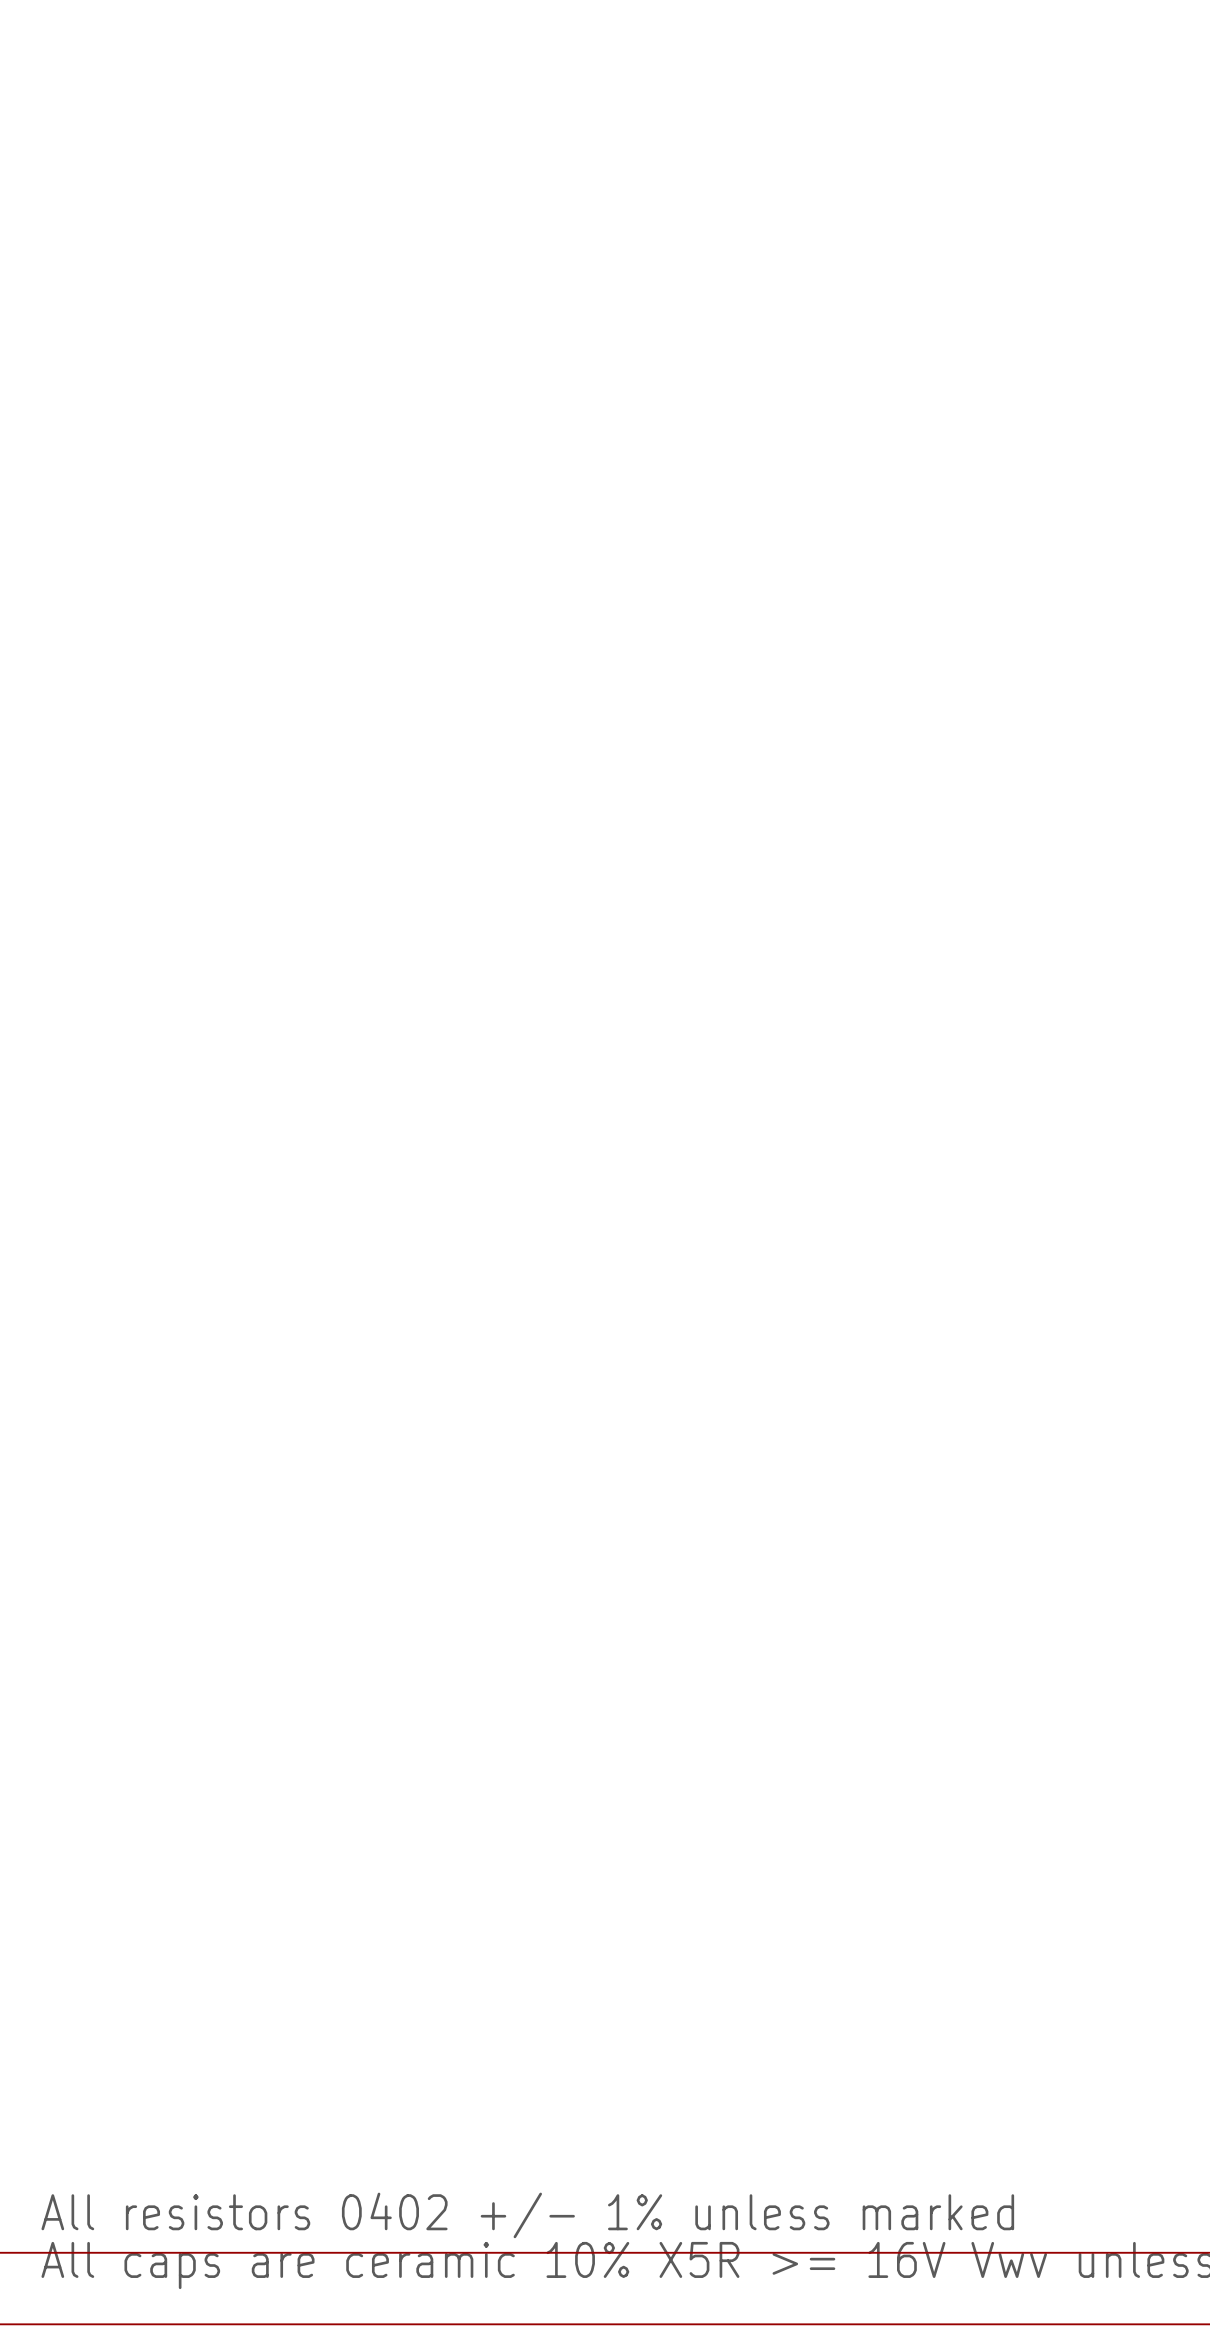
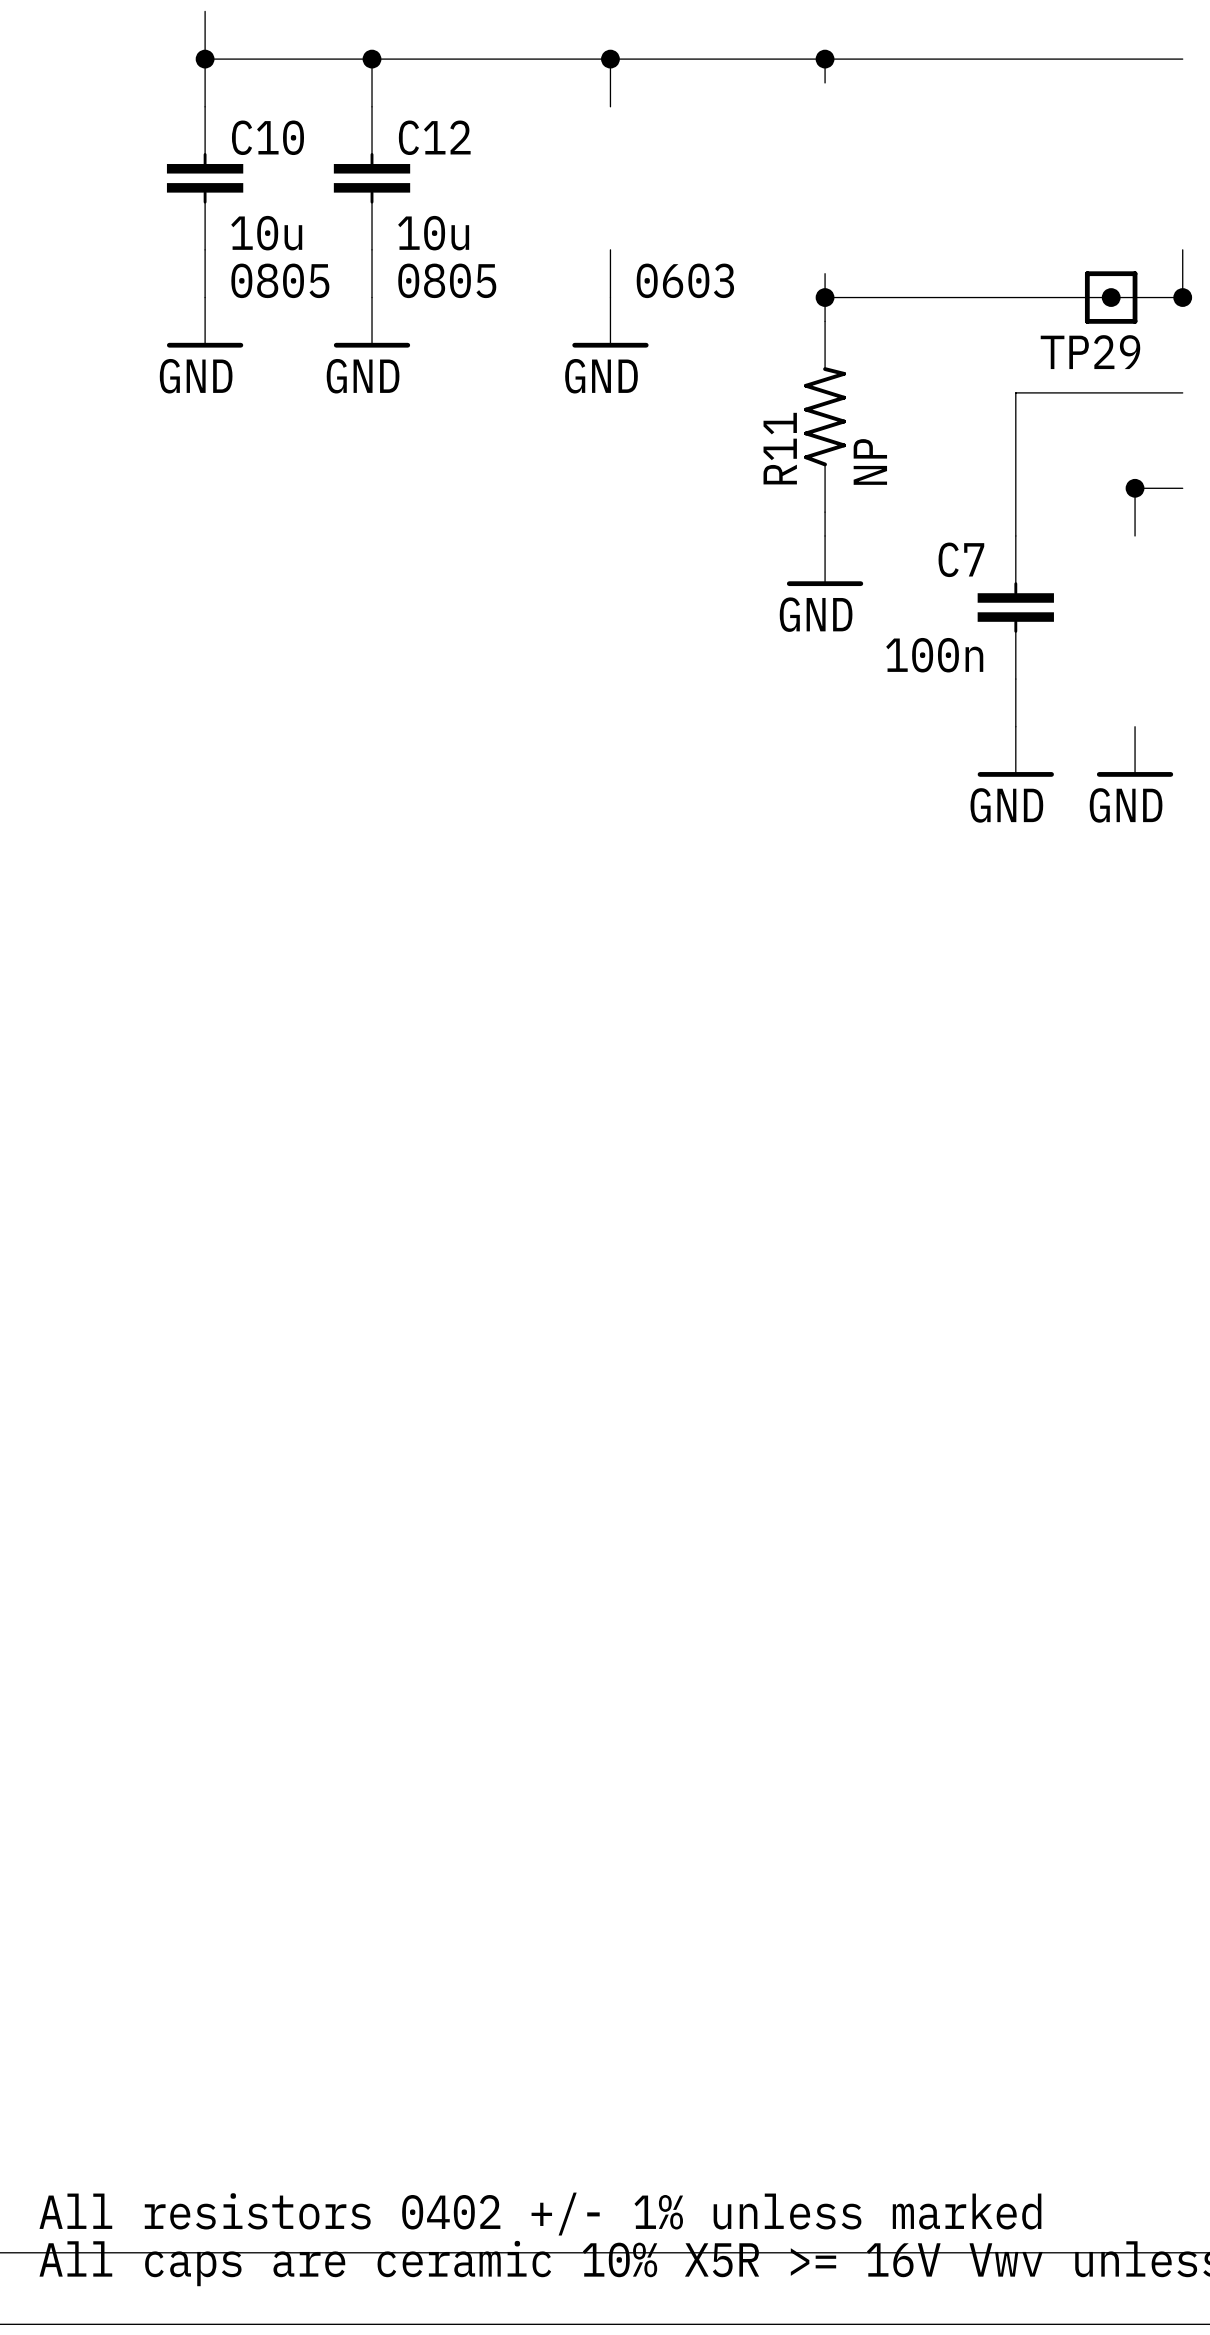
wire: none -> (205, 11) (205, 106)
wire: none -> (205, 59) (1182, 59)
junction: none -> (205, 59)
wire: none -> (372, 59) (372, 106)
junction: none -> (372, 59)
wire: none -> (610, 59) (610, 106)
junction: none -> (610, 59)
wire: none -> (825, 59) (825, 82)
junction: none -> (825, 59)
C10: none -> 10u (205, 178)
C12: none -> 10u (372, 178)
wire: none -> (205, 249) (205, 297)
wire: none -> (372, 249) (372, 297)
wire: none -> (610, 249) (610, 297)
wire: none -> (1182, 249) (1182, 297) (825, 297)
wire: none -> (825, 273) (825, 321)
text: none -> 0805 (280, 280)
text: none -> 0805 (447, 280)
text: none -> 0603 (685, 280)
junction: none -> (825, 297)
TP29: none -> (1111, 297)
junction: none -> (1111, 297)
junction: none -> (1182, 297)
power symbol: none -> GND (205, 322)
power symbol: none -> GND (372, 322)
power symbol: none -> GND (610, 322)
wire: none -> (1182, 392) (1015, 392) (1015, 535)
R11: none -> NP (825, 416)
junction: none -> (1135, 488)
wire: none -> (1182, 488) (1135, 488) (1135, 535)
wire: none -> (825, 512) (825, 535)
power symbol: none -> GND (825, 561)
C7: none -> 100n (1015, 607)
wire: none -> (1015, 679) (1015, 726)
power symbol: none -> GND (1015, 751)
power symbol: none -> GND (1135, 751)

